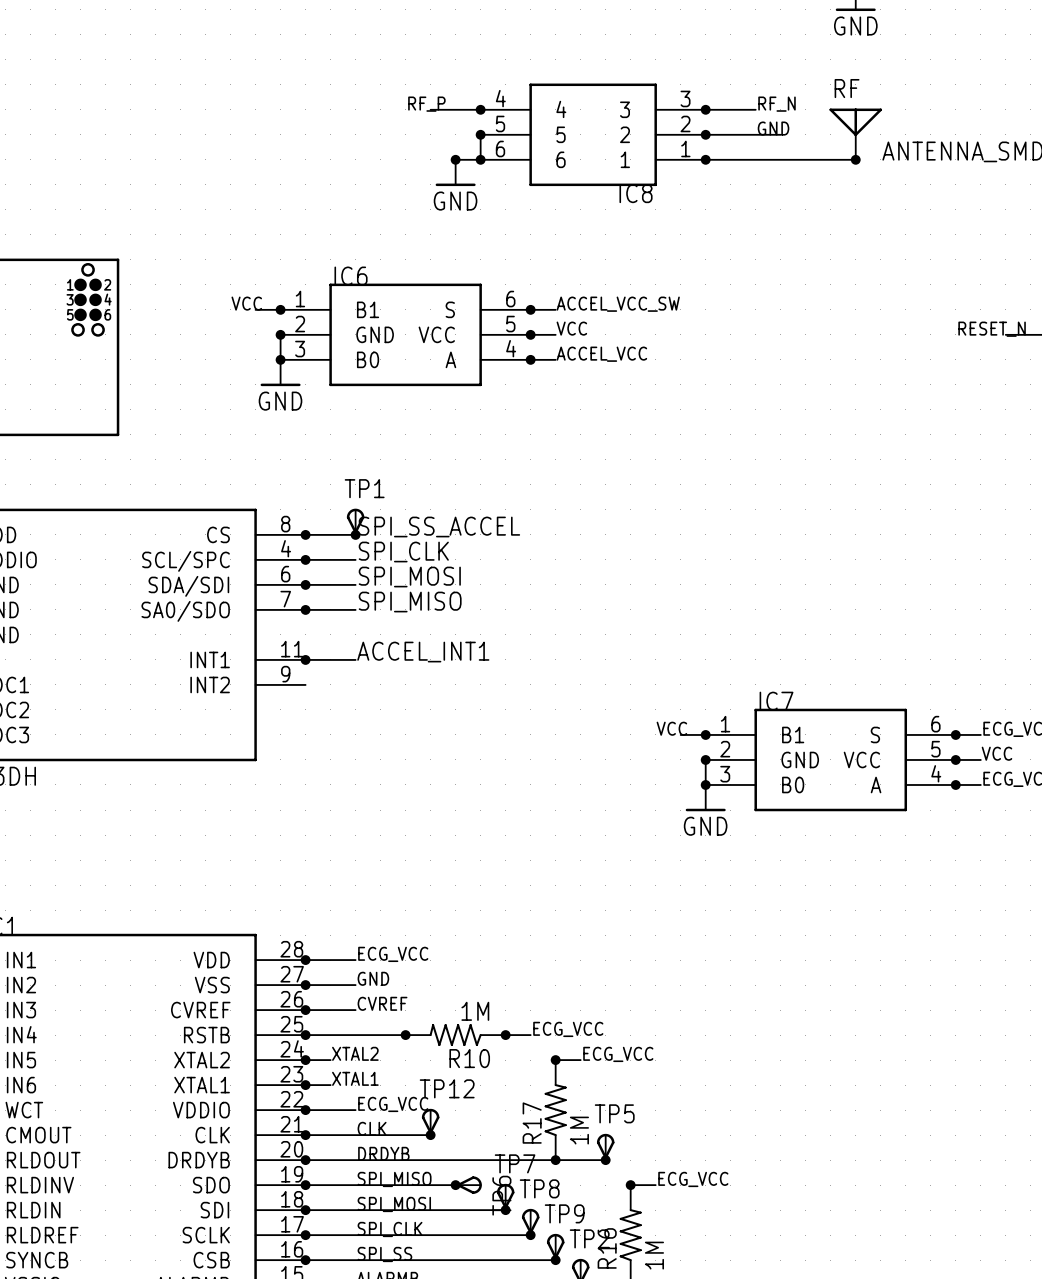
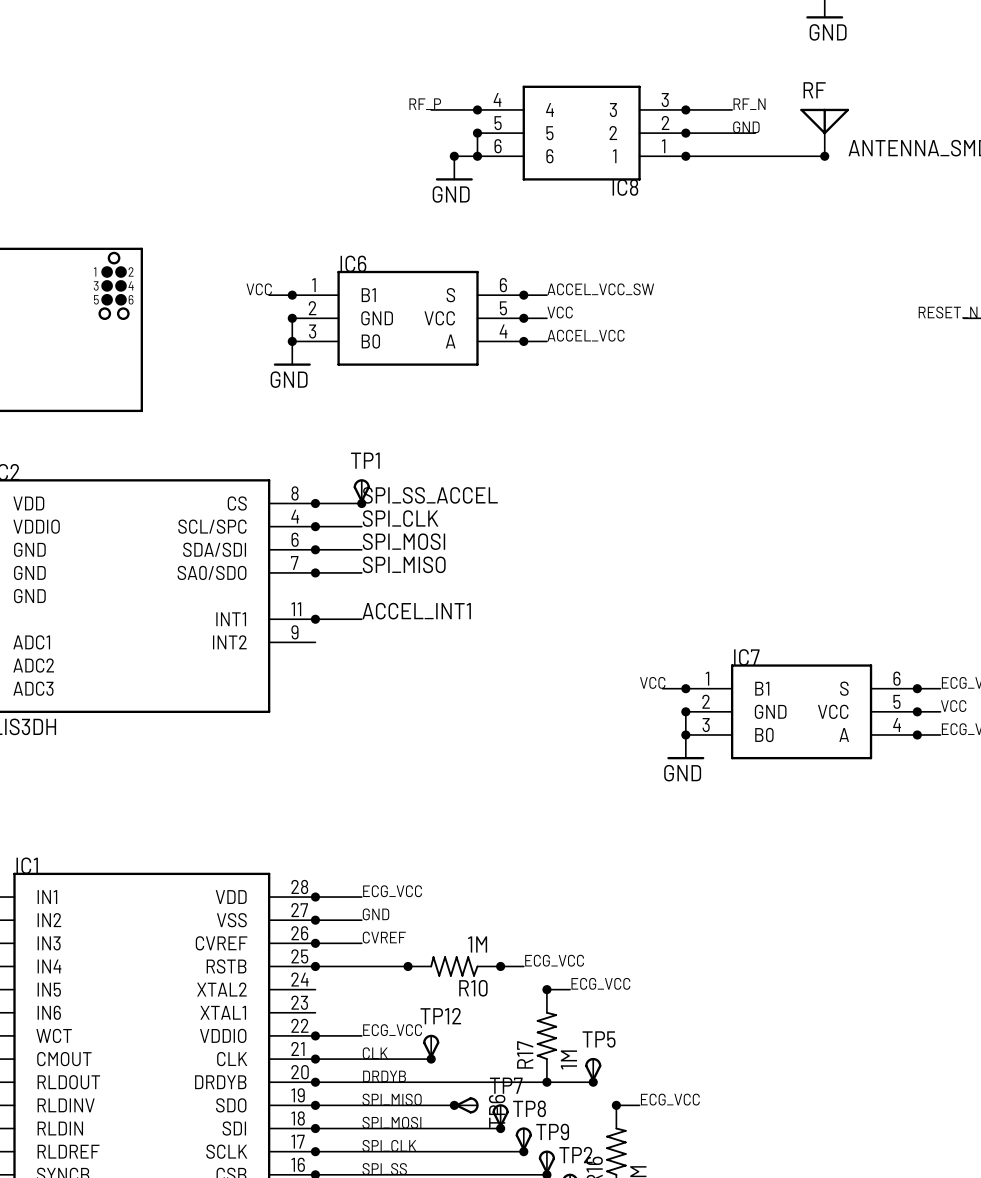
label: XTAL2 (355, 1053) -> none
wire: (305, 1060) (330, 1060) -> none
junction: (305, 1060) -> none
label: XTAL1 (355, 1078) -> none
wire: (305, 1085) (330, 1085) -> none
junction: (305, 1085) -> none

